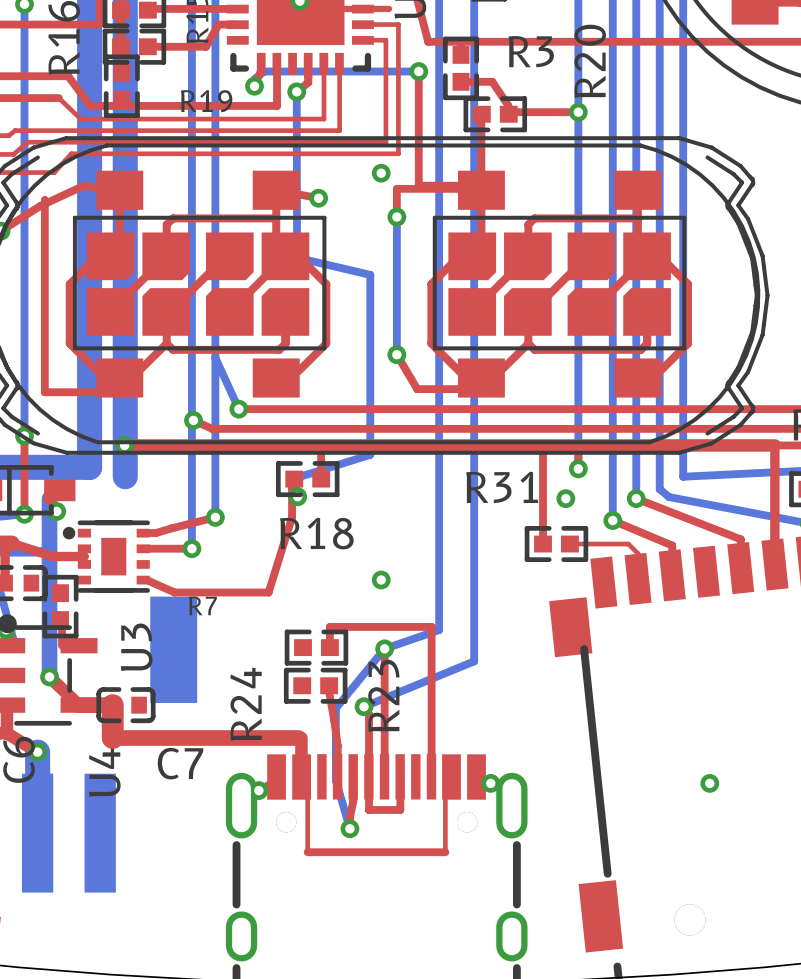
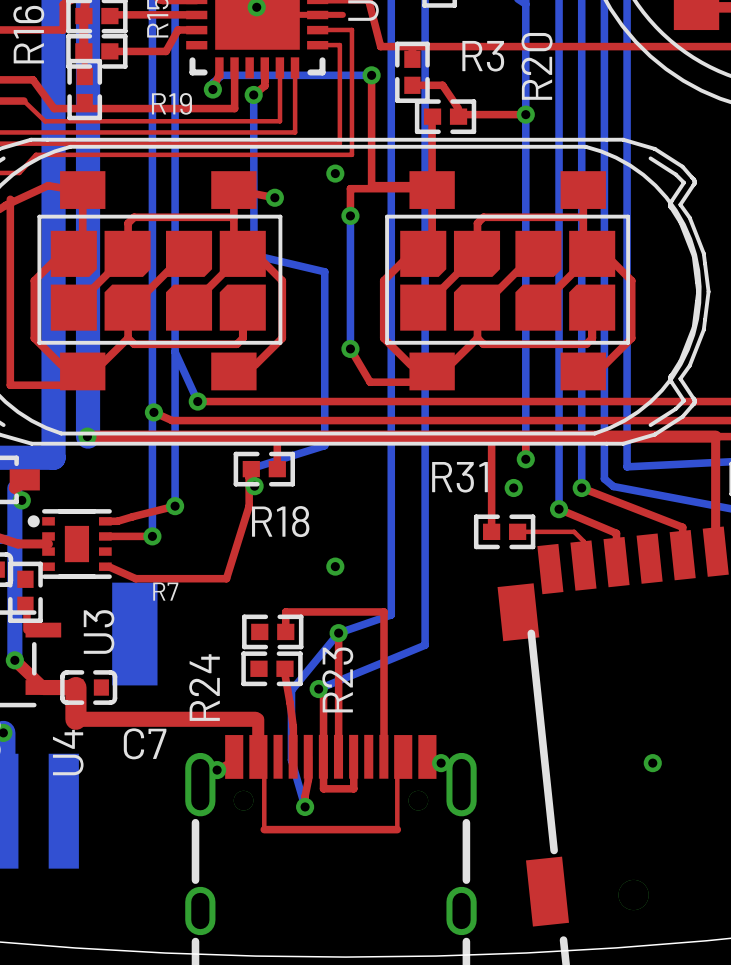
bottom track: (125, 445) (125, 476) -> none

